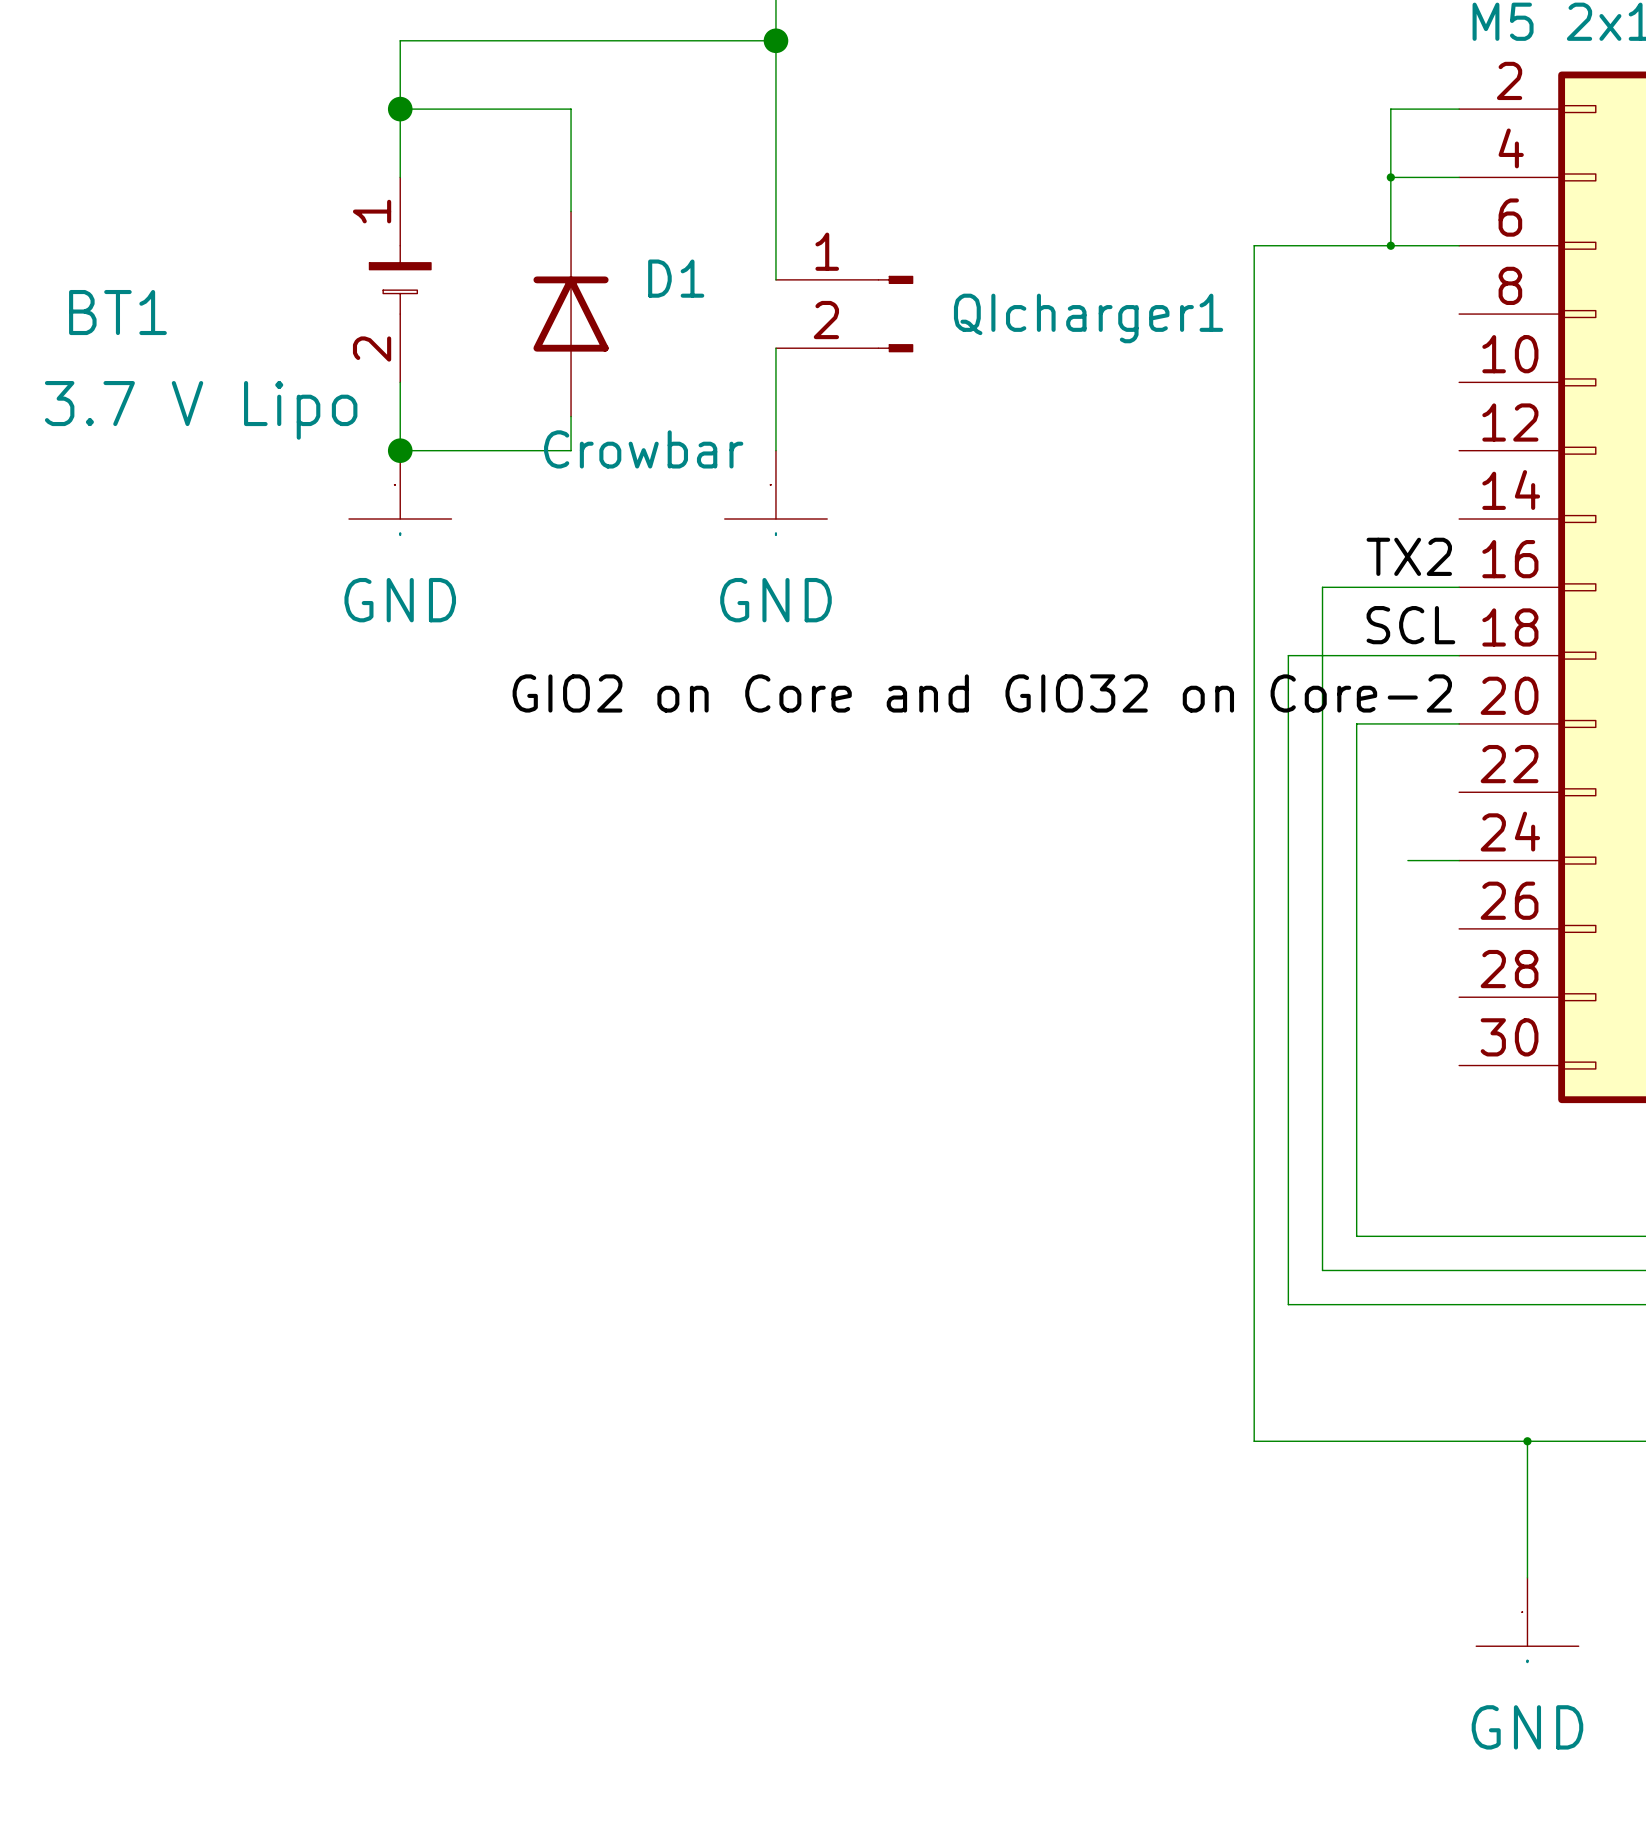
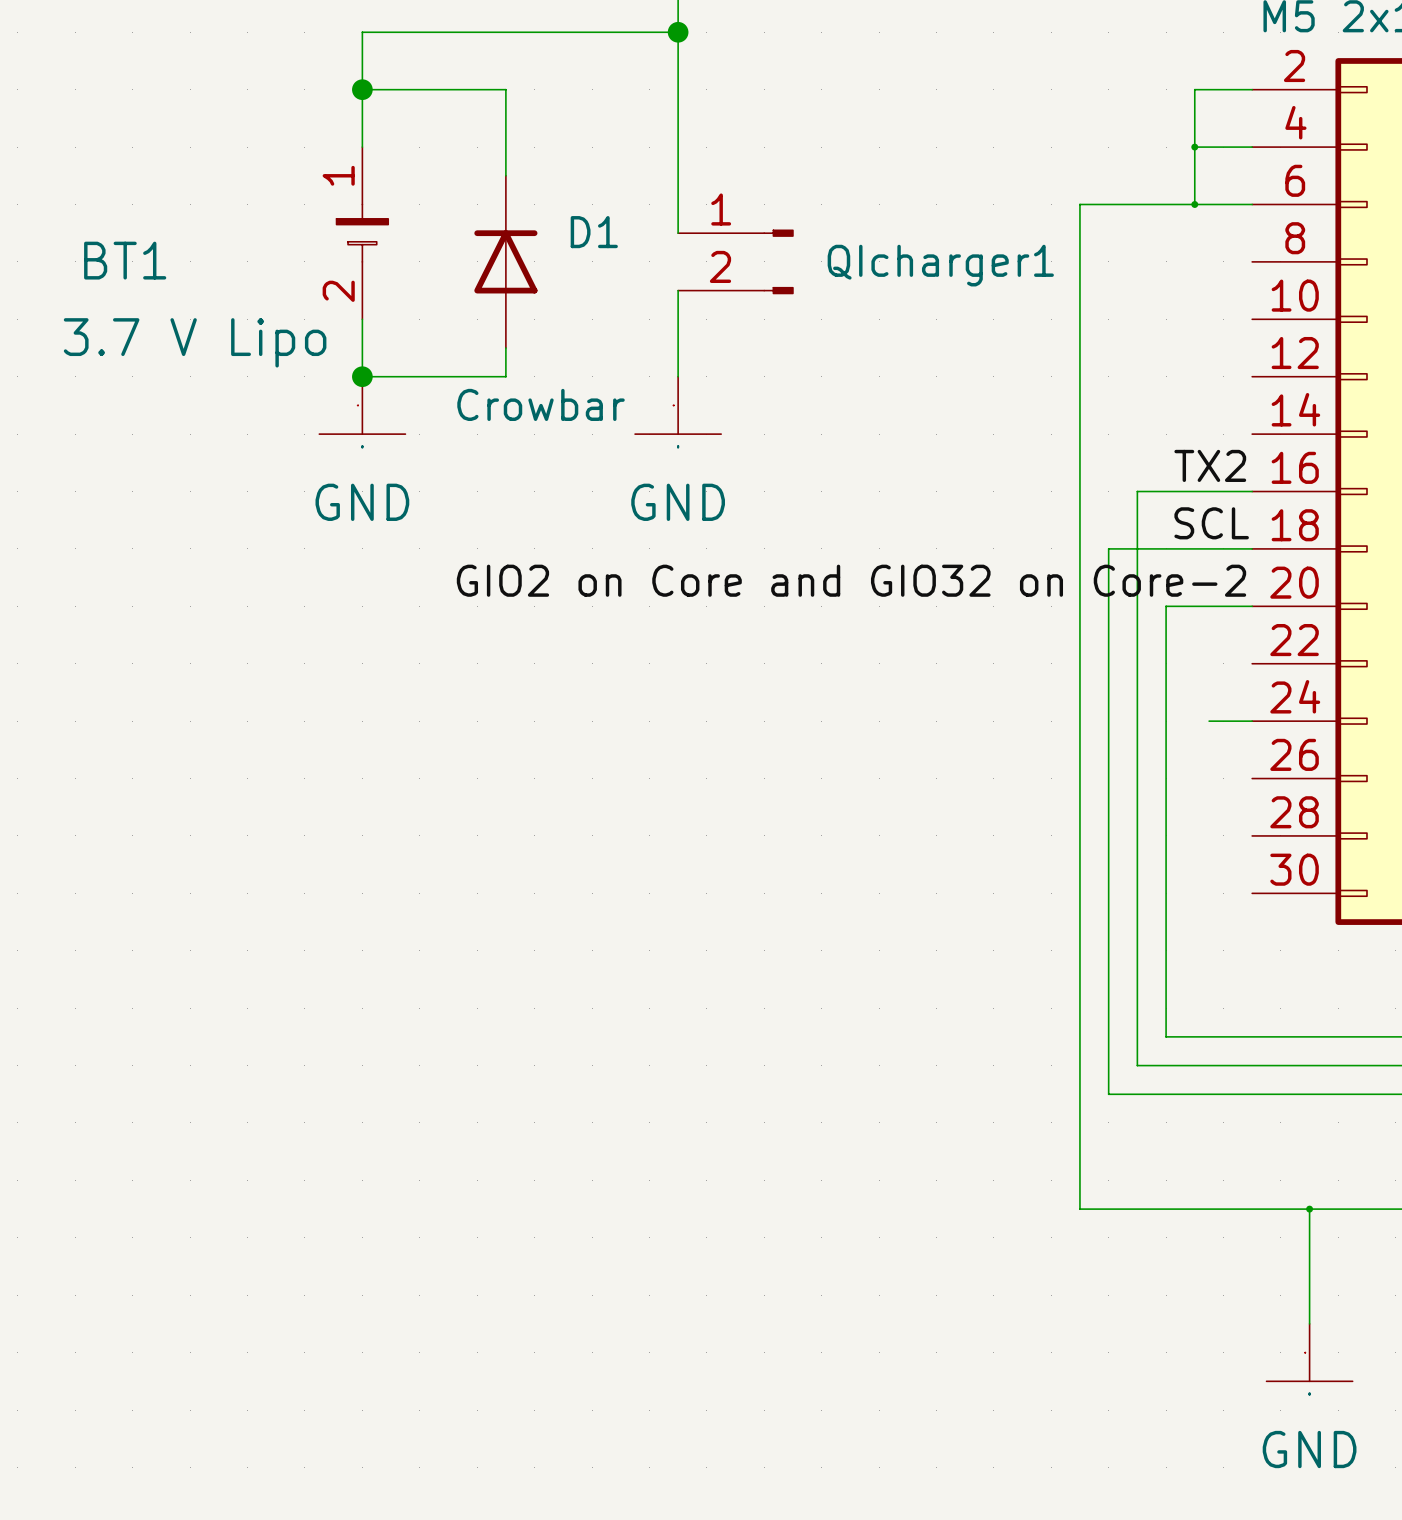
D1 value position: Crowbar (643, 449) -> Crowbar (541, 404)

